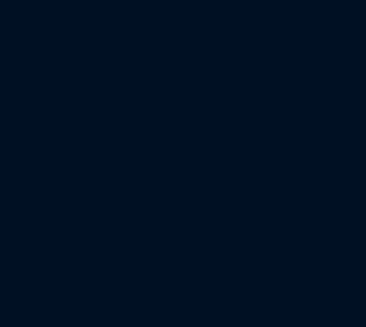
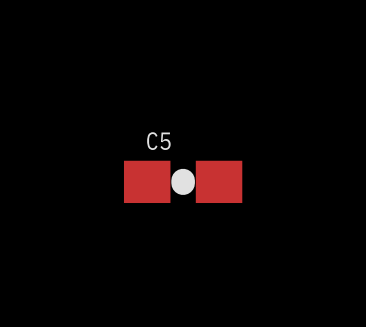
C5: none -> (183, 181)

